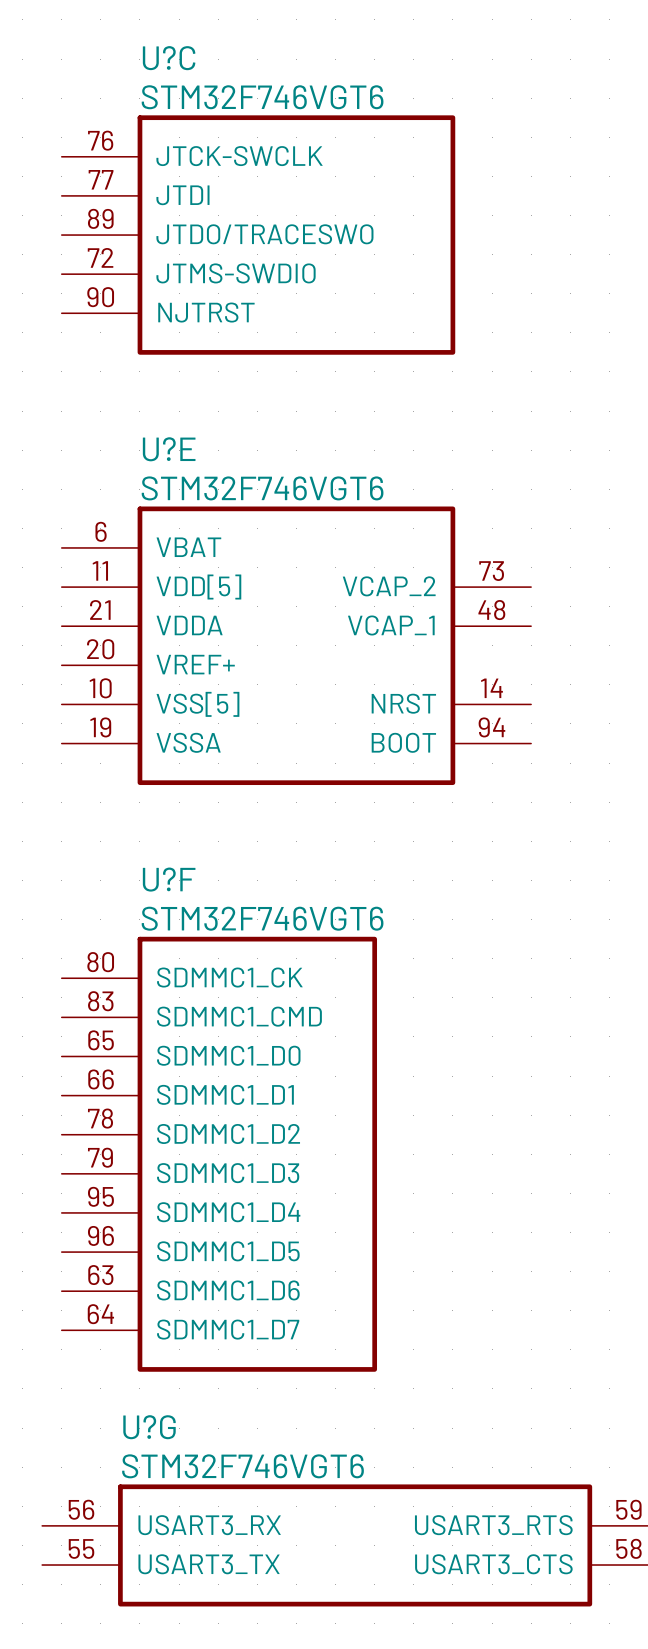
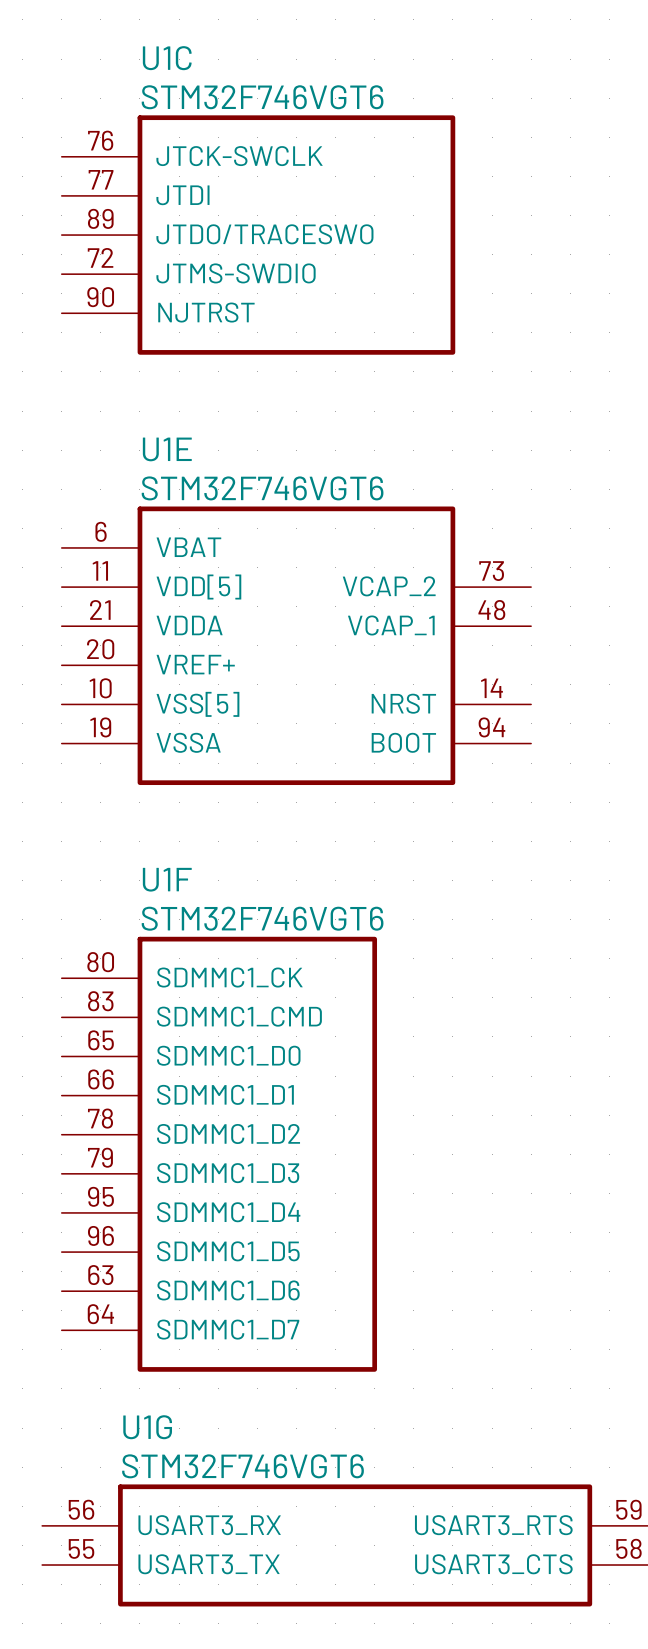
U?C name: U?C (169, 58) -> U1C (167, 58)
U?E name: U?E (169, 449) -> U1E (167, 449)
U?F name: U?F (169, 879) -> U1F (167, 879)
U?G name: U?G (149, 1427) -> U1G (147, 1427)

